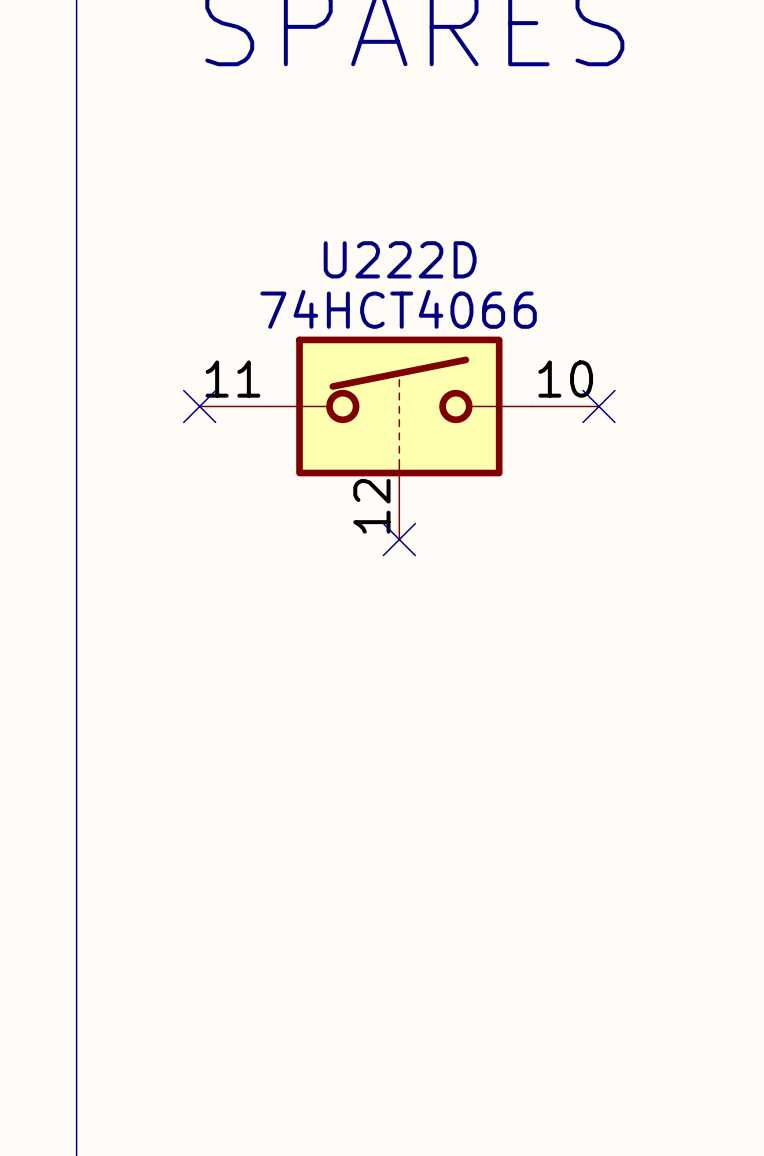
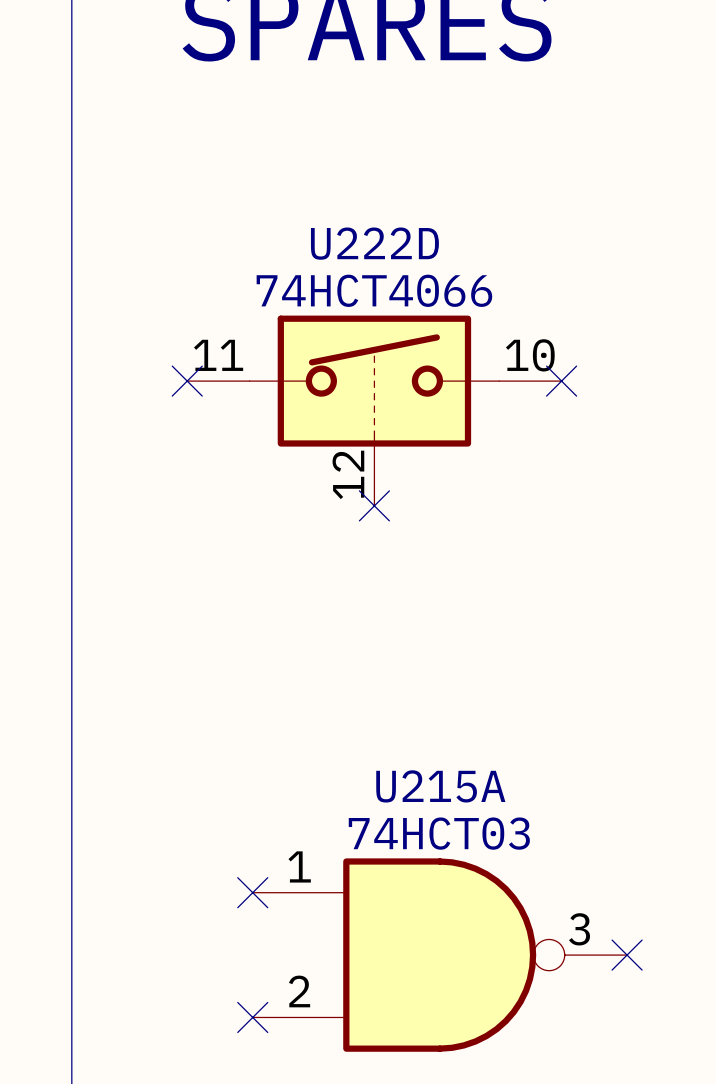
no-connect mark: none -> (252, 892)
U215A: none -> 74HCT03 (439, 955)
no-connect mark: none -> (627, 955)
no-connect mark: none -> (252, 1017)

